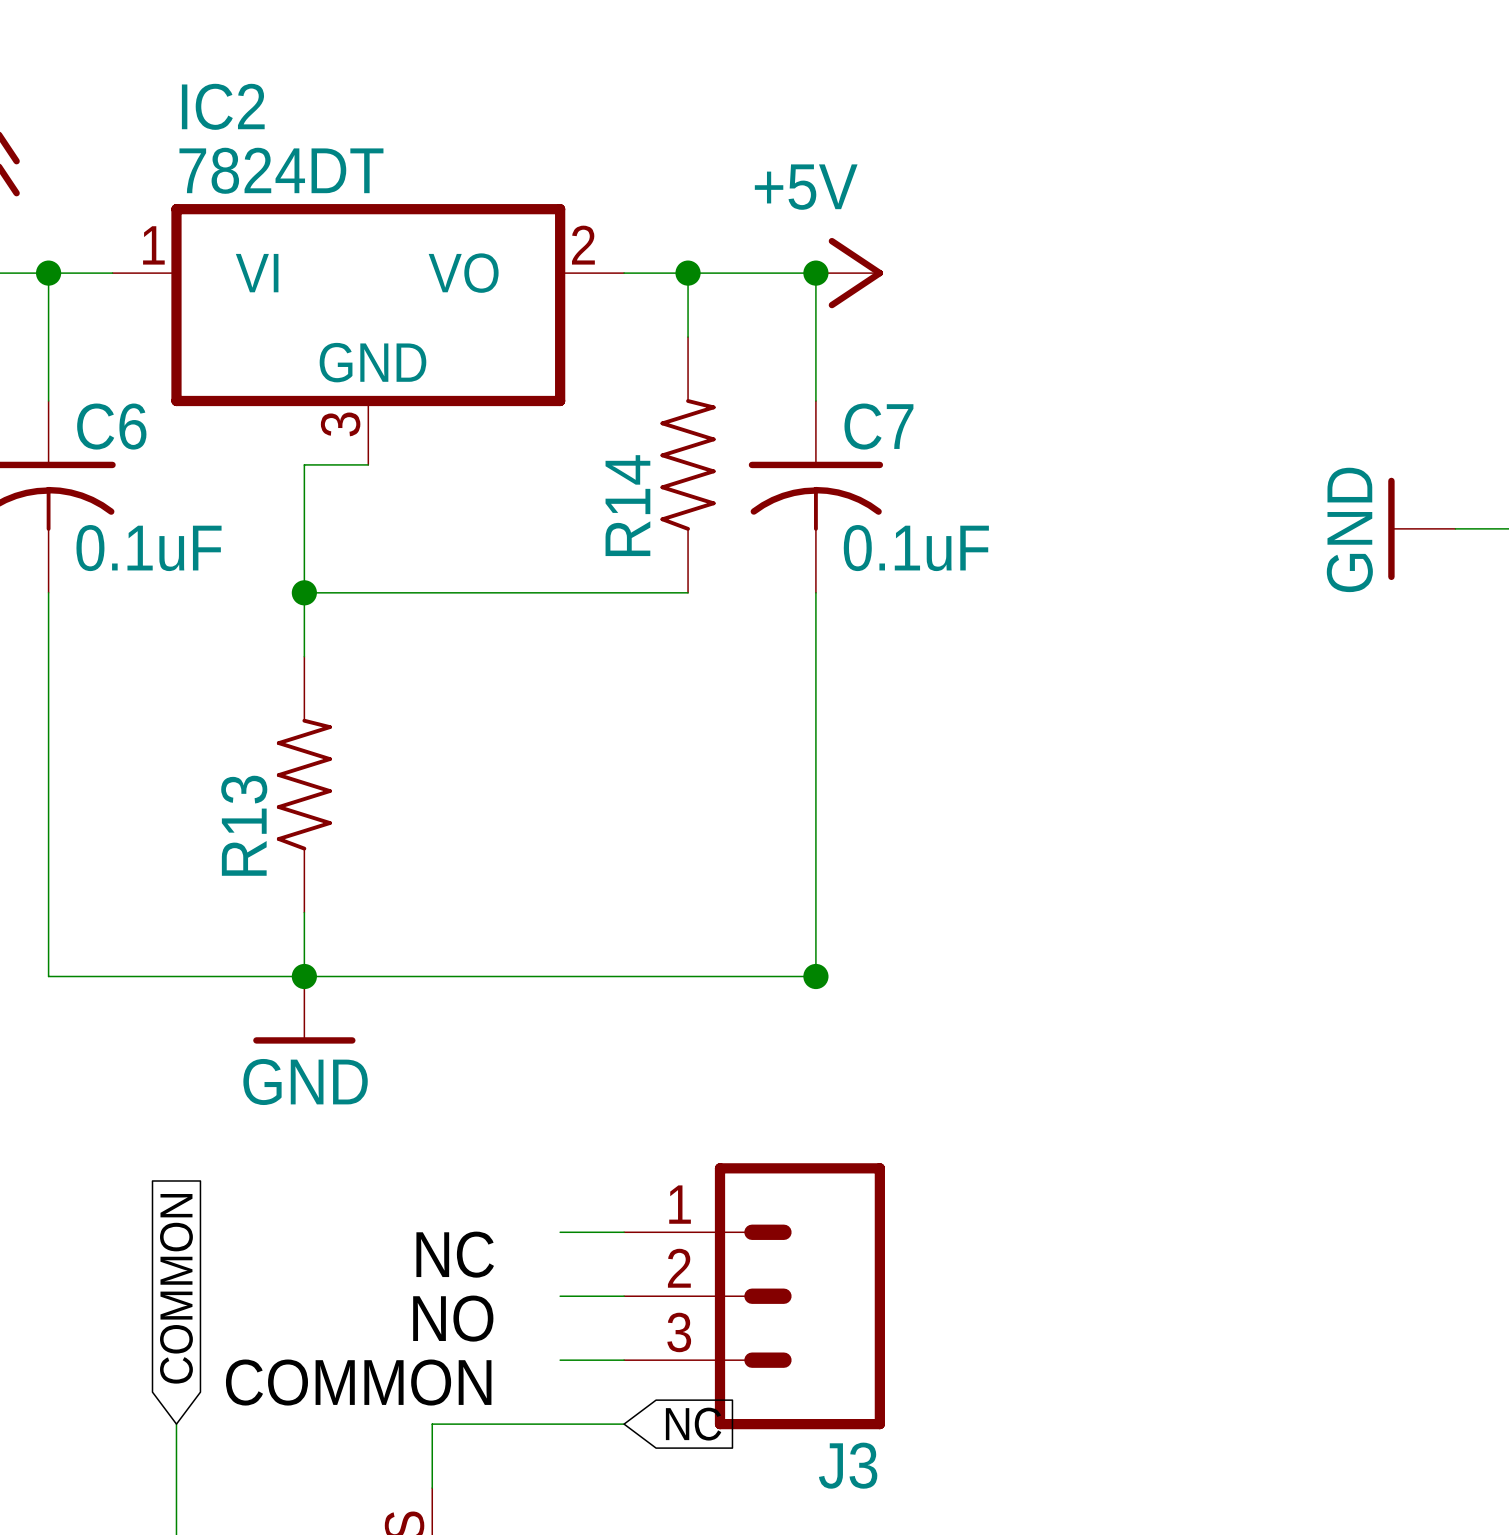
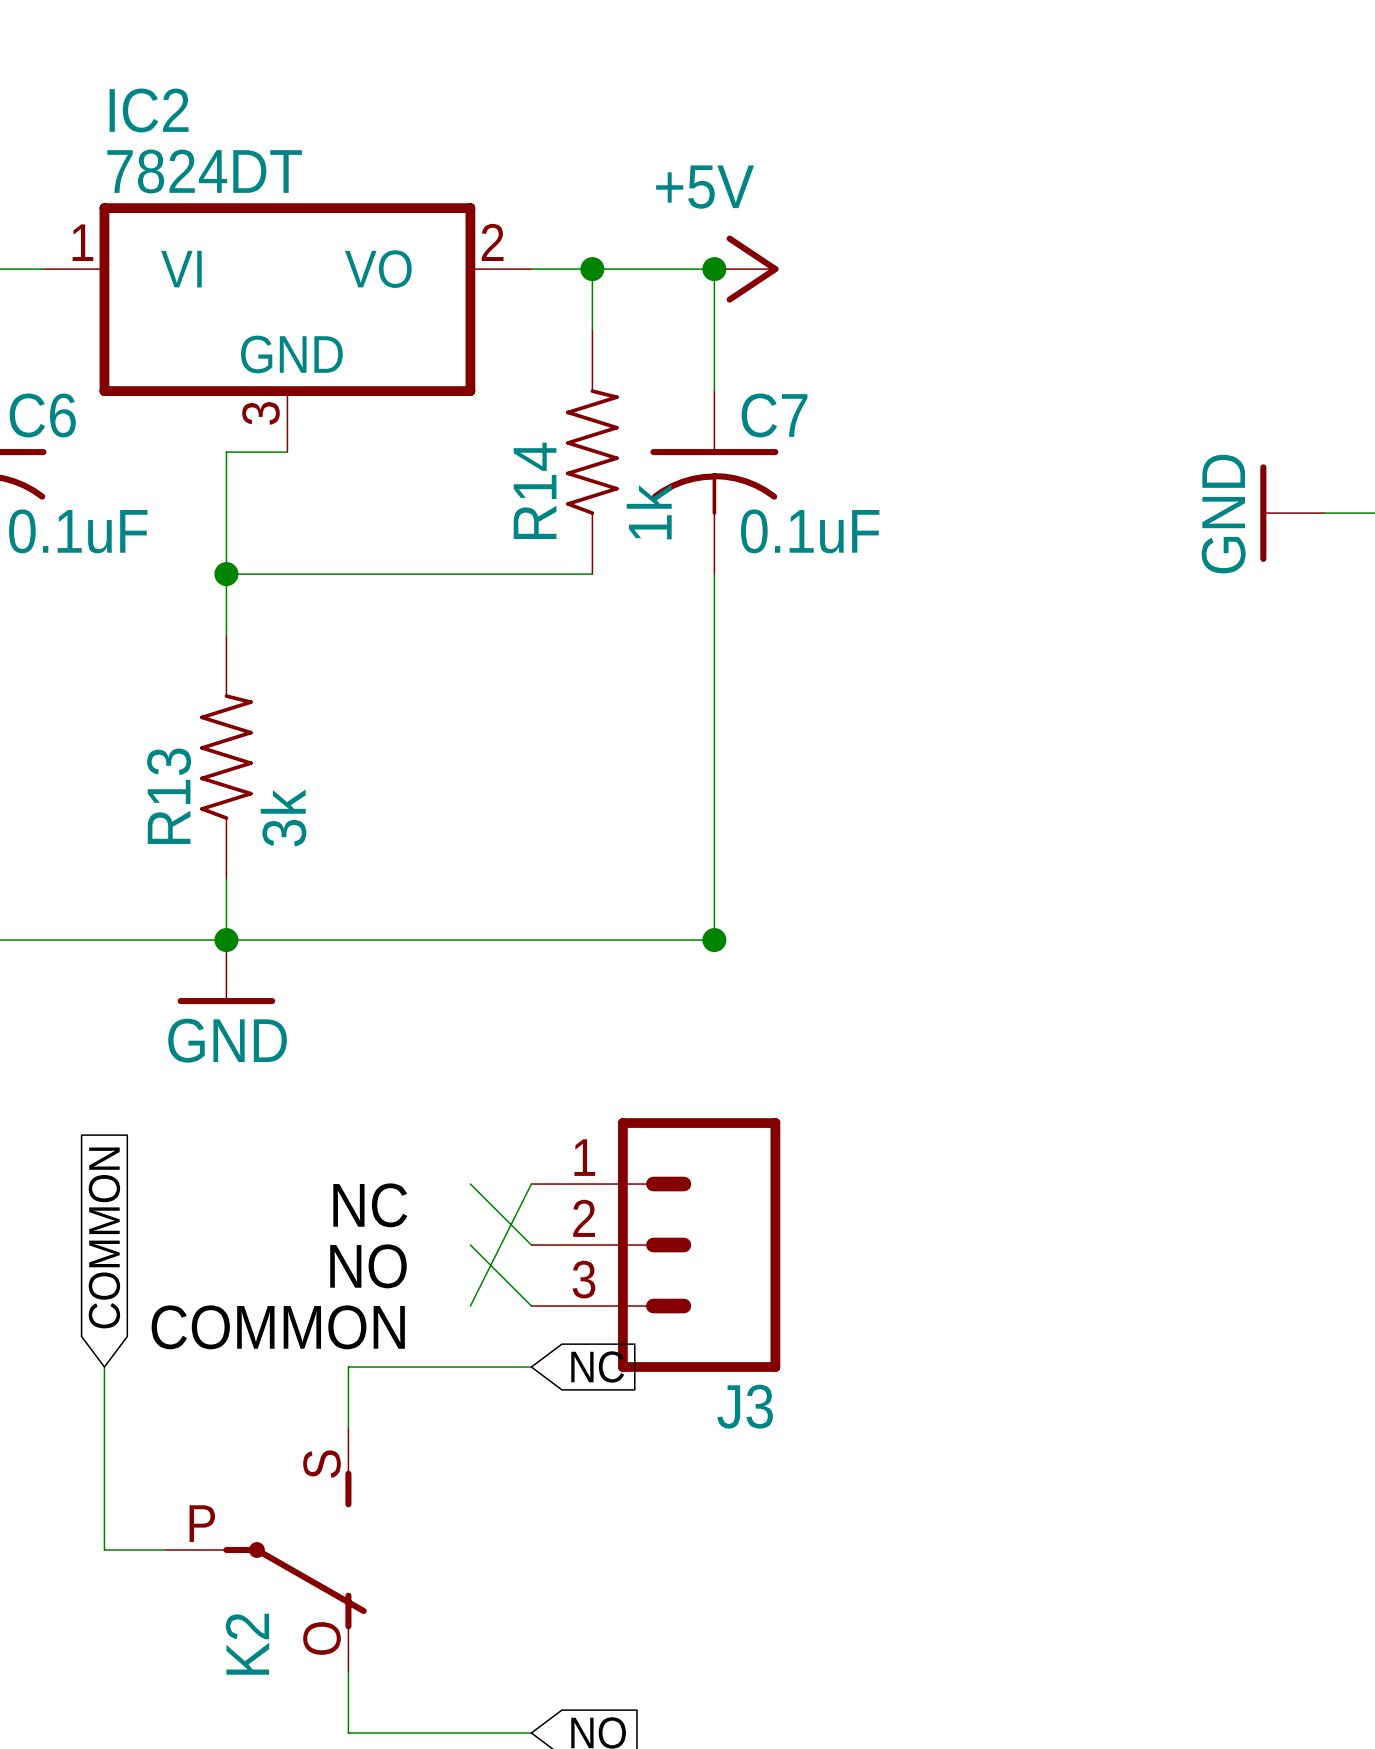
R14 value: none -> 1k (649, 511)
R13 value: none -> 3k (283, 817)
wire: (560, 1232) (624, 1232) -> (470, 1184) (531, 1245)
wire: (560, 1296) (624, 1296) -> (470, 1245) (531, 1306)
wire: (560, 1360) (624, 1360) -> (470, 1306) (531, 1184)

